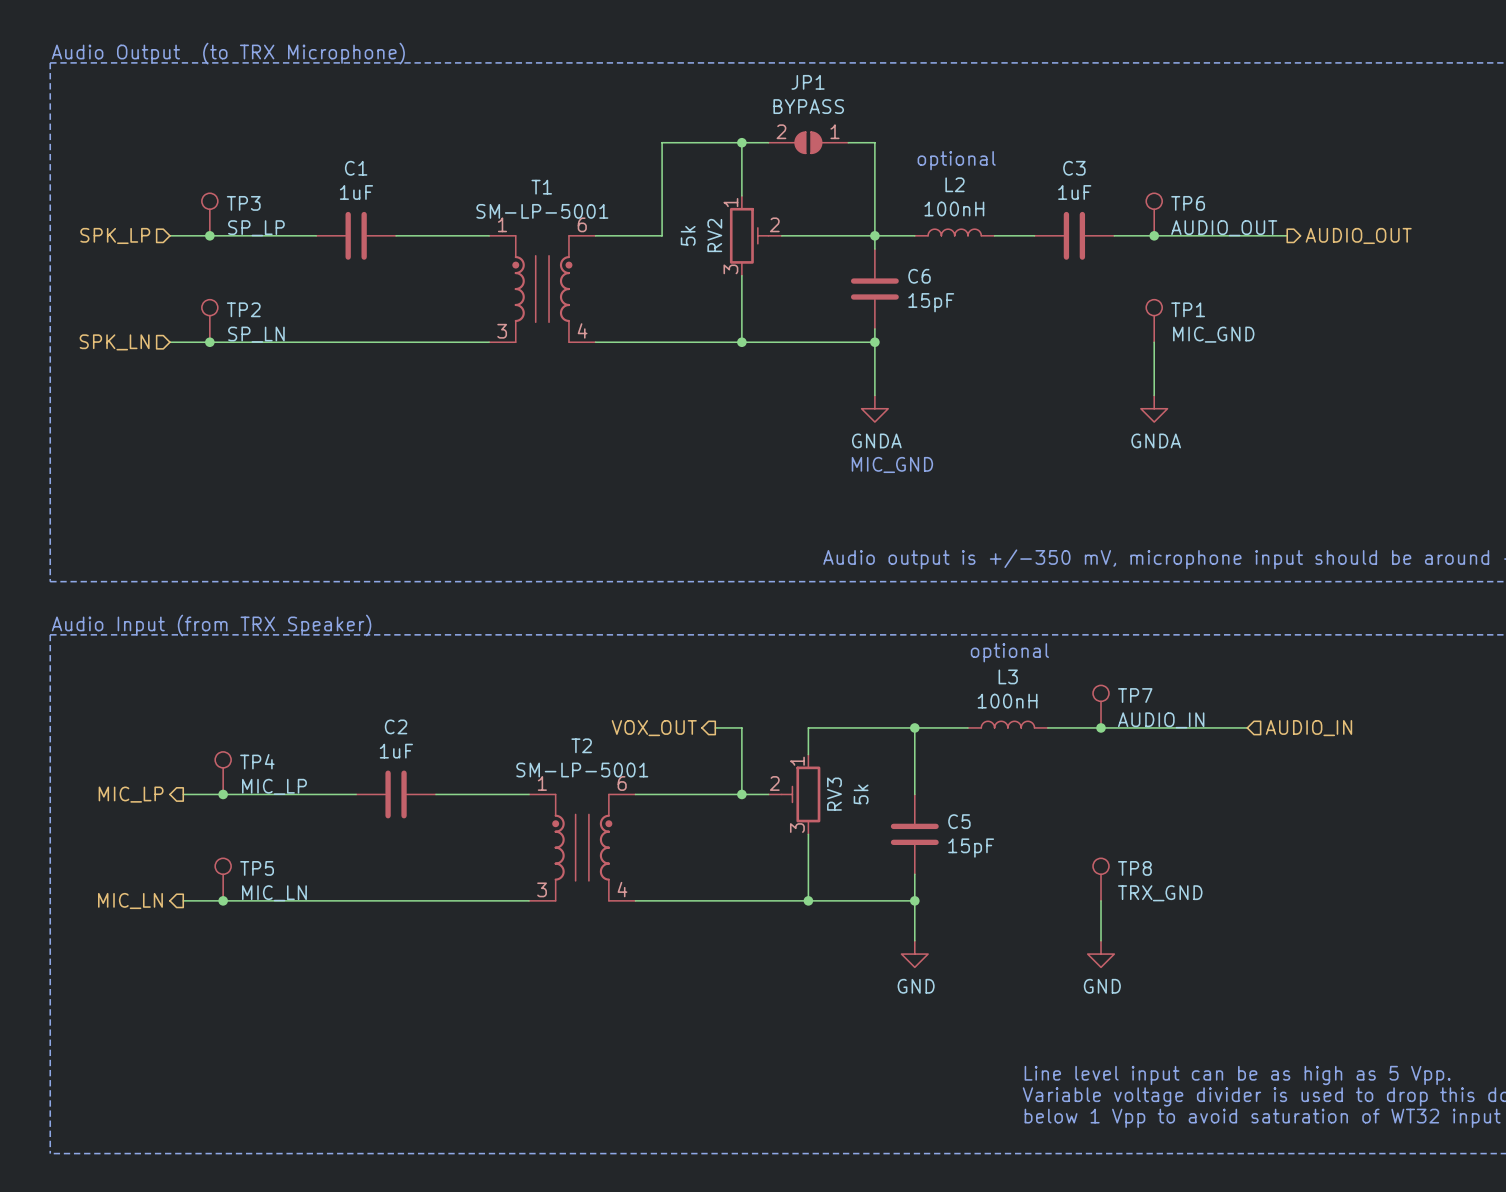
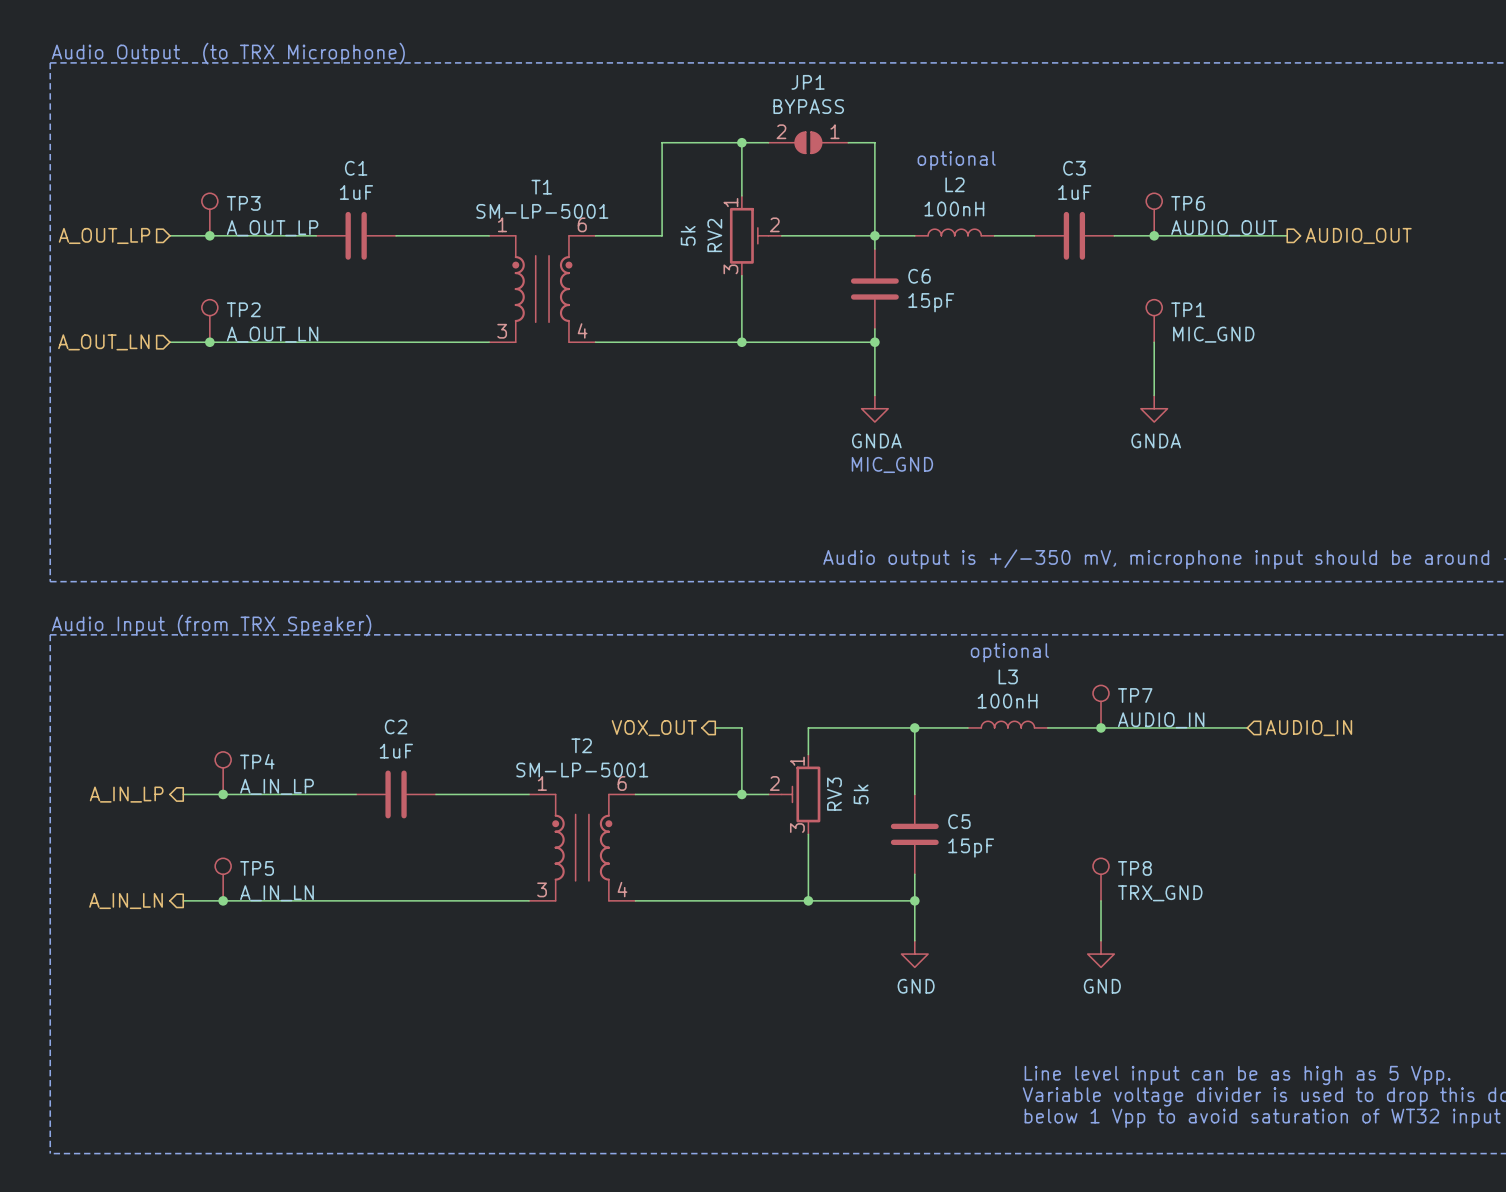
TP3 value: SP_LP (256, 228) -> A_OUT_LP (272, 228)
hierarchical label: SPK_LP (115, 235) -> A_OUT_LP (104, 235)
TP2 value: SP_LN (256, 334) -> A_OUT_LN (272, 334)
hierarchical label: SPK_LN (114, 342) -> A_OUT_LN (103, 342)
TP4 value: MIC_LP (274, 786) -> A_IN_LP (276, 786)
hierarchical label: MIC_LP (131, 794) -> A_IN_LP (126, 794)
TP5 value: MIC_LN (274, 893) -> A_IN_LN (276, 893)
hierarchical label: MIC_LN (130, 901) -> A_IN_LN (126, 901)

